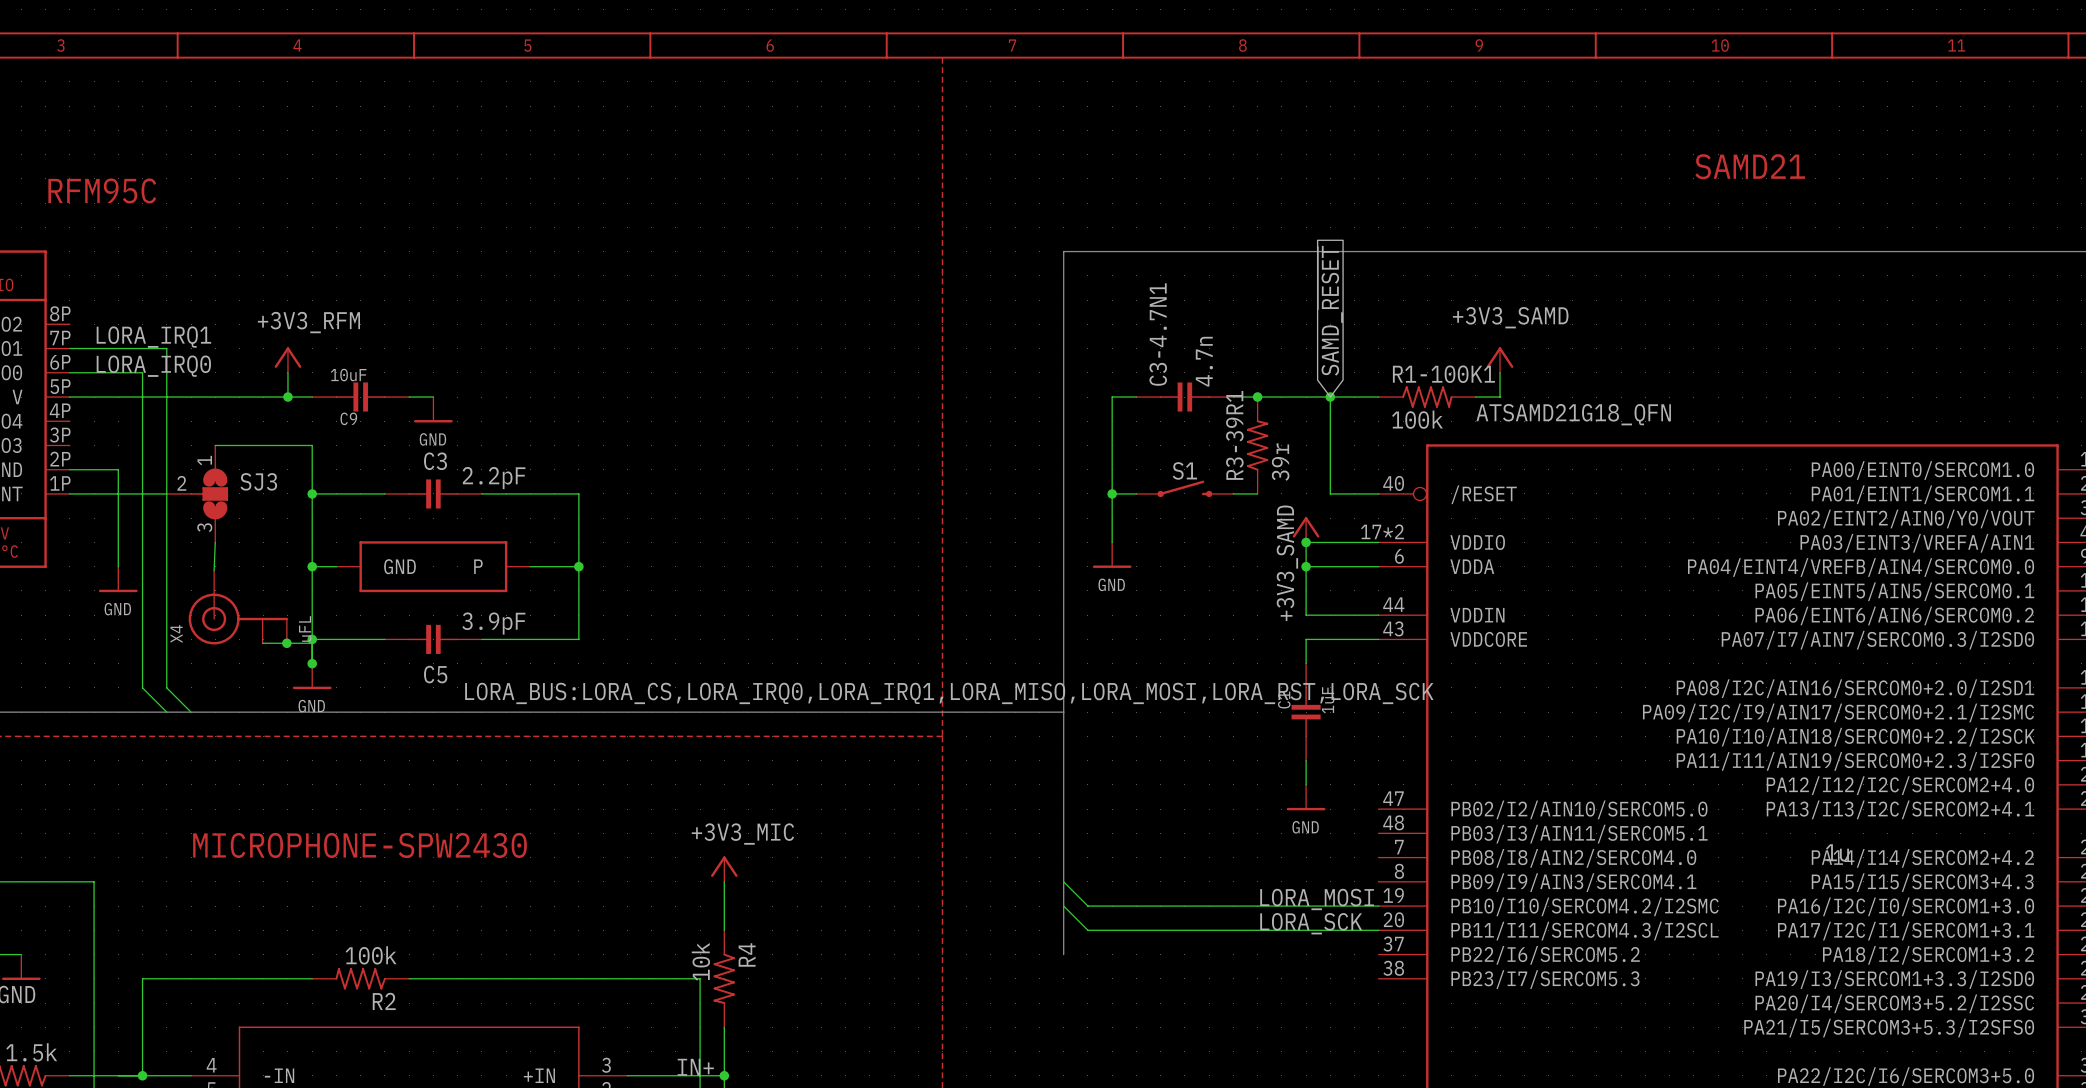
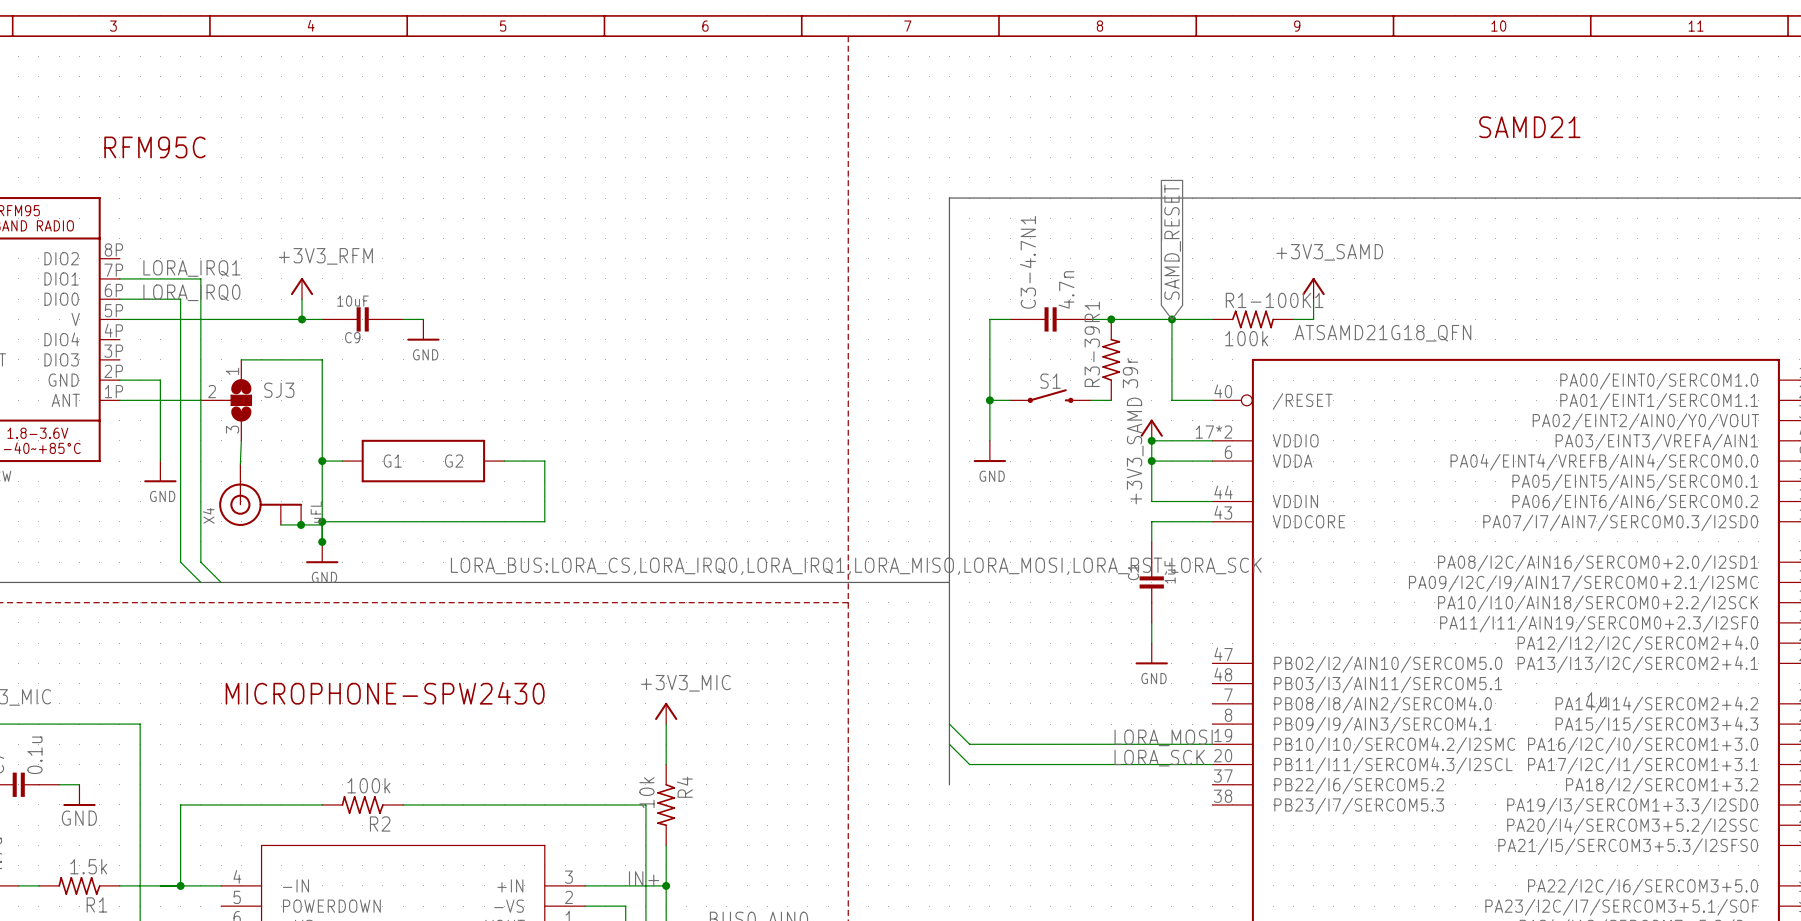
wire: (312, 493) (384, 493) -> none
junction: (312, 493) -> none
C3: 2.2pF (433, 493) -> none
wire: (481, 493) (578, 493) (578, 566) -> none
part pin name: GND (400, 566) -> G1 (392, 461)
part pin name: P (478, 566) -> G2 (454, 461)
junction: (578, 566) -> none
C5: 3.9pF (433, 639) -> none

